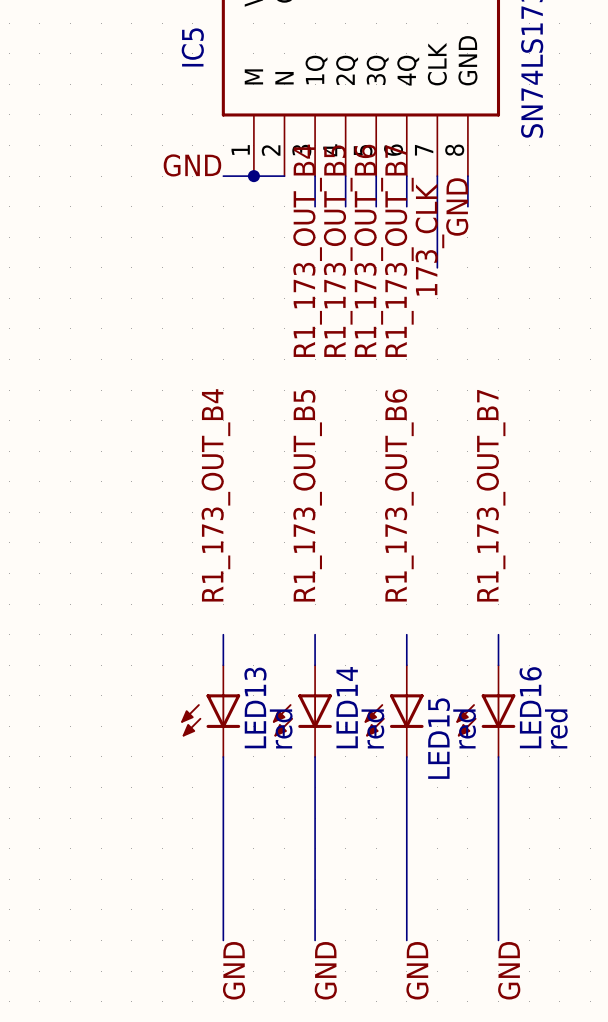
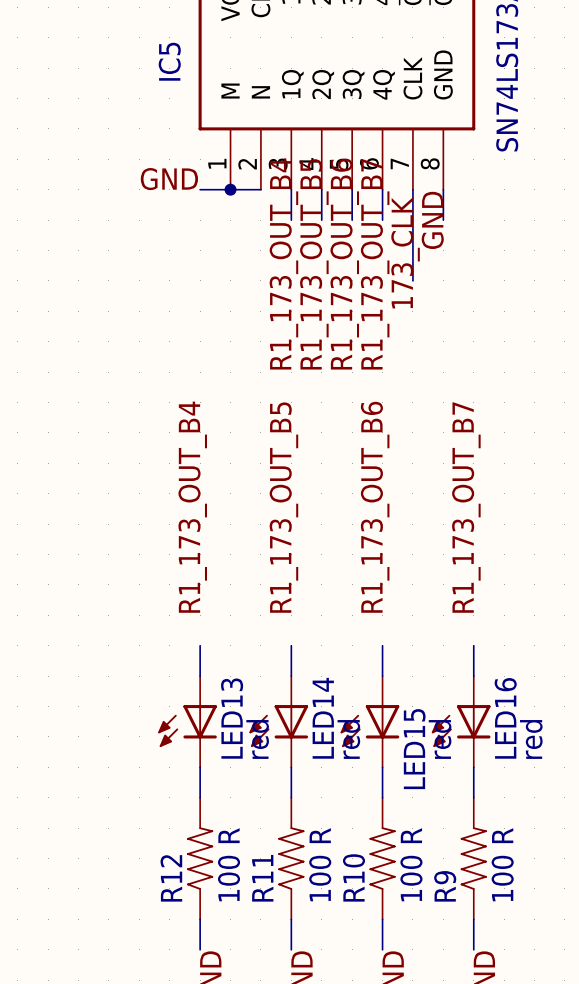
R12: none -> 100 R (200, 858)
R11: none -> 100 R (291, 858)
R10: none -> 100 R (382, 858)
R9: none -> 100 R (473, 858)

